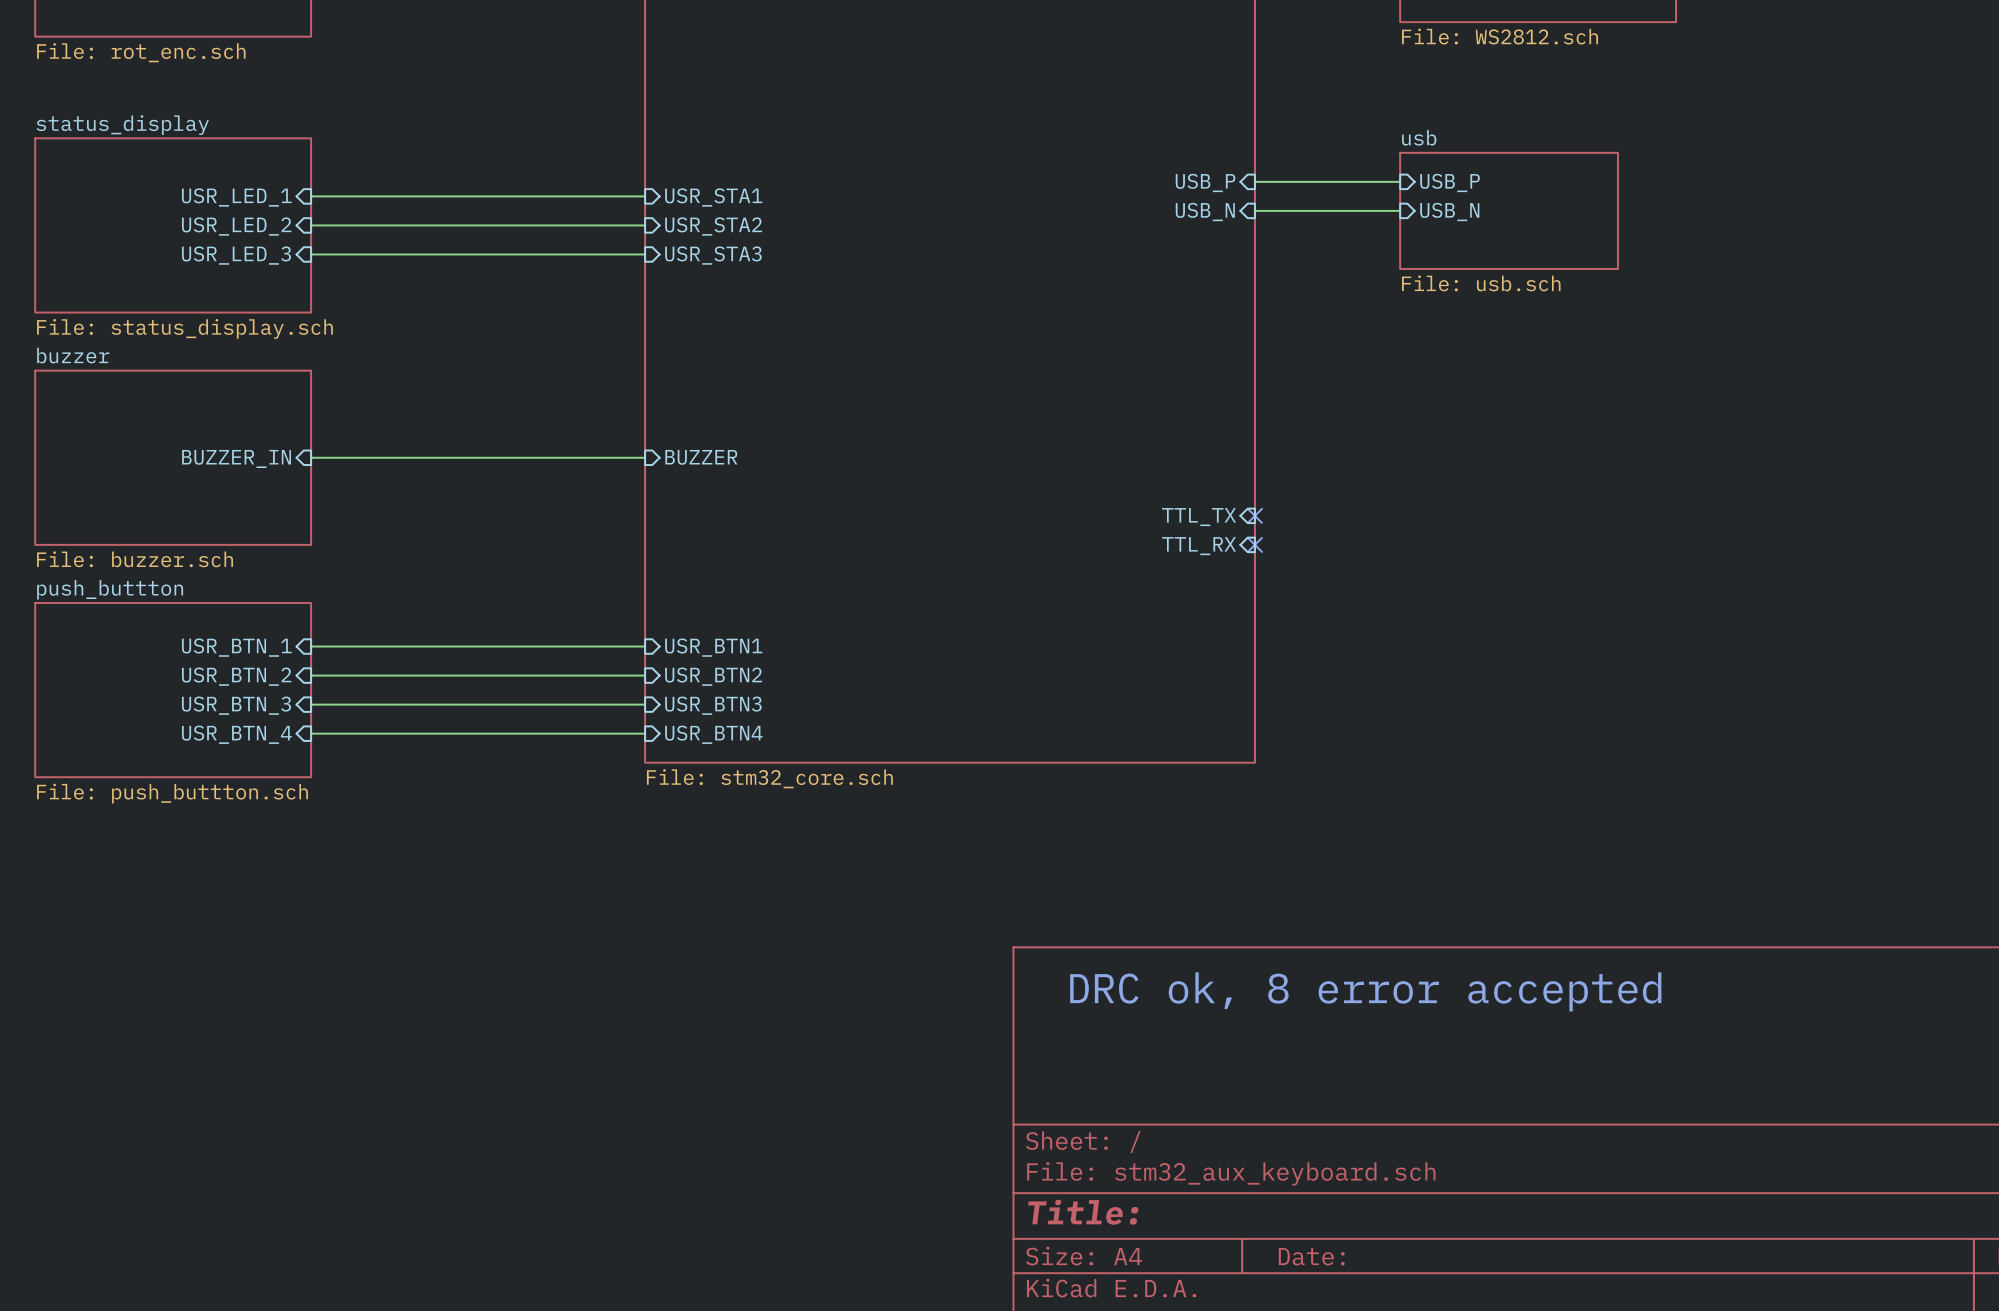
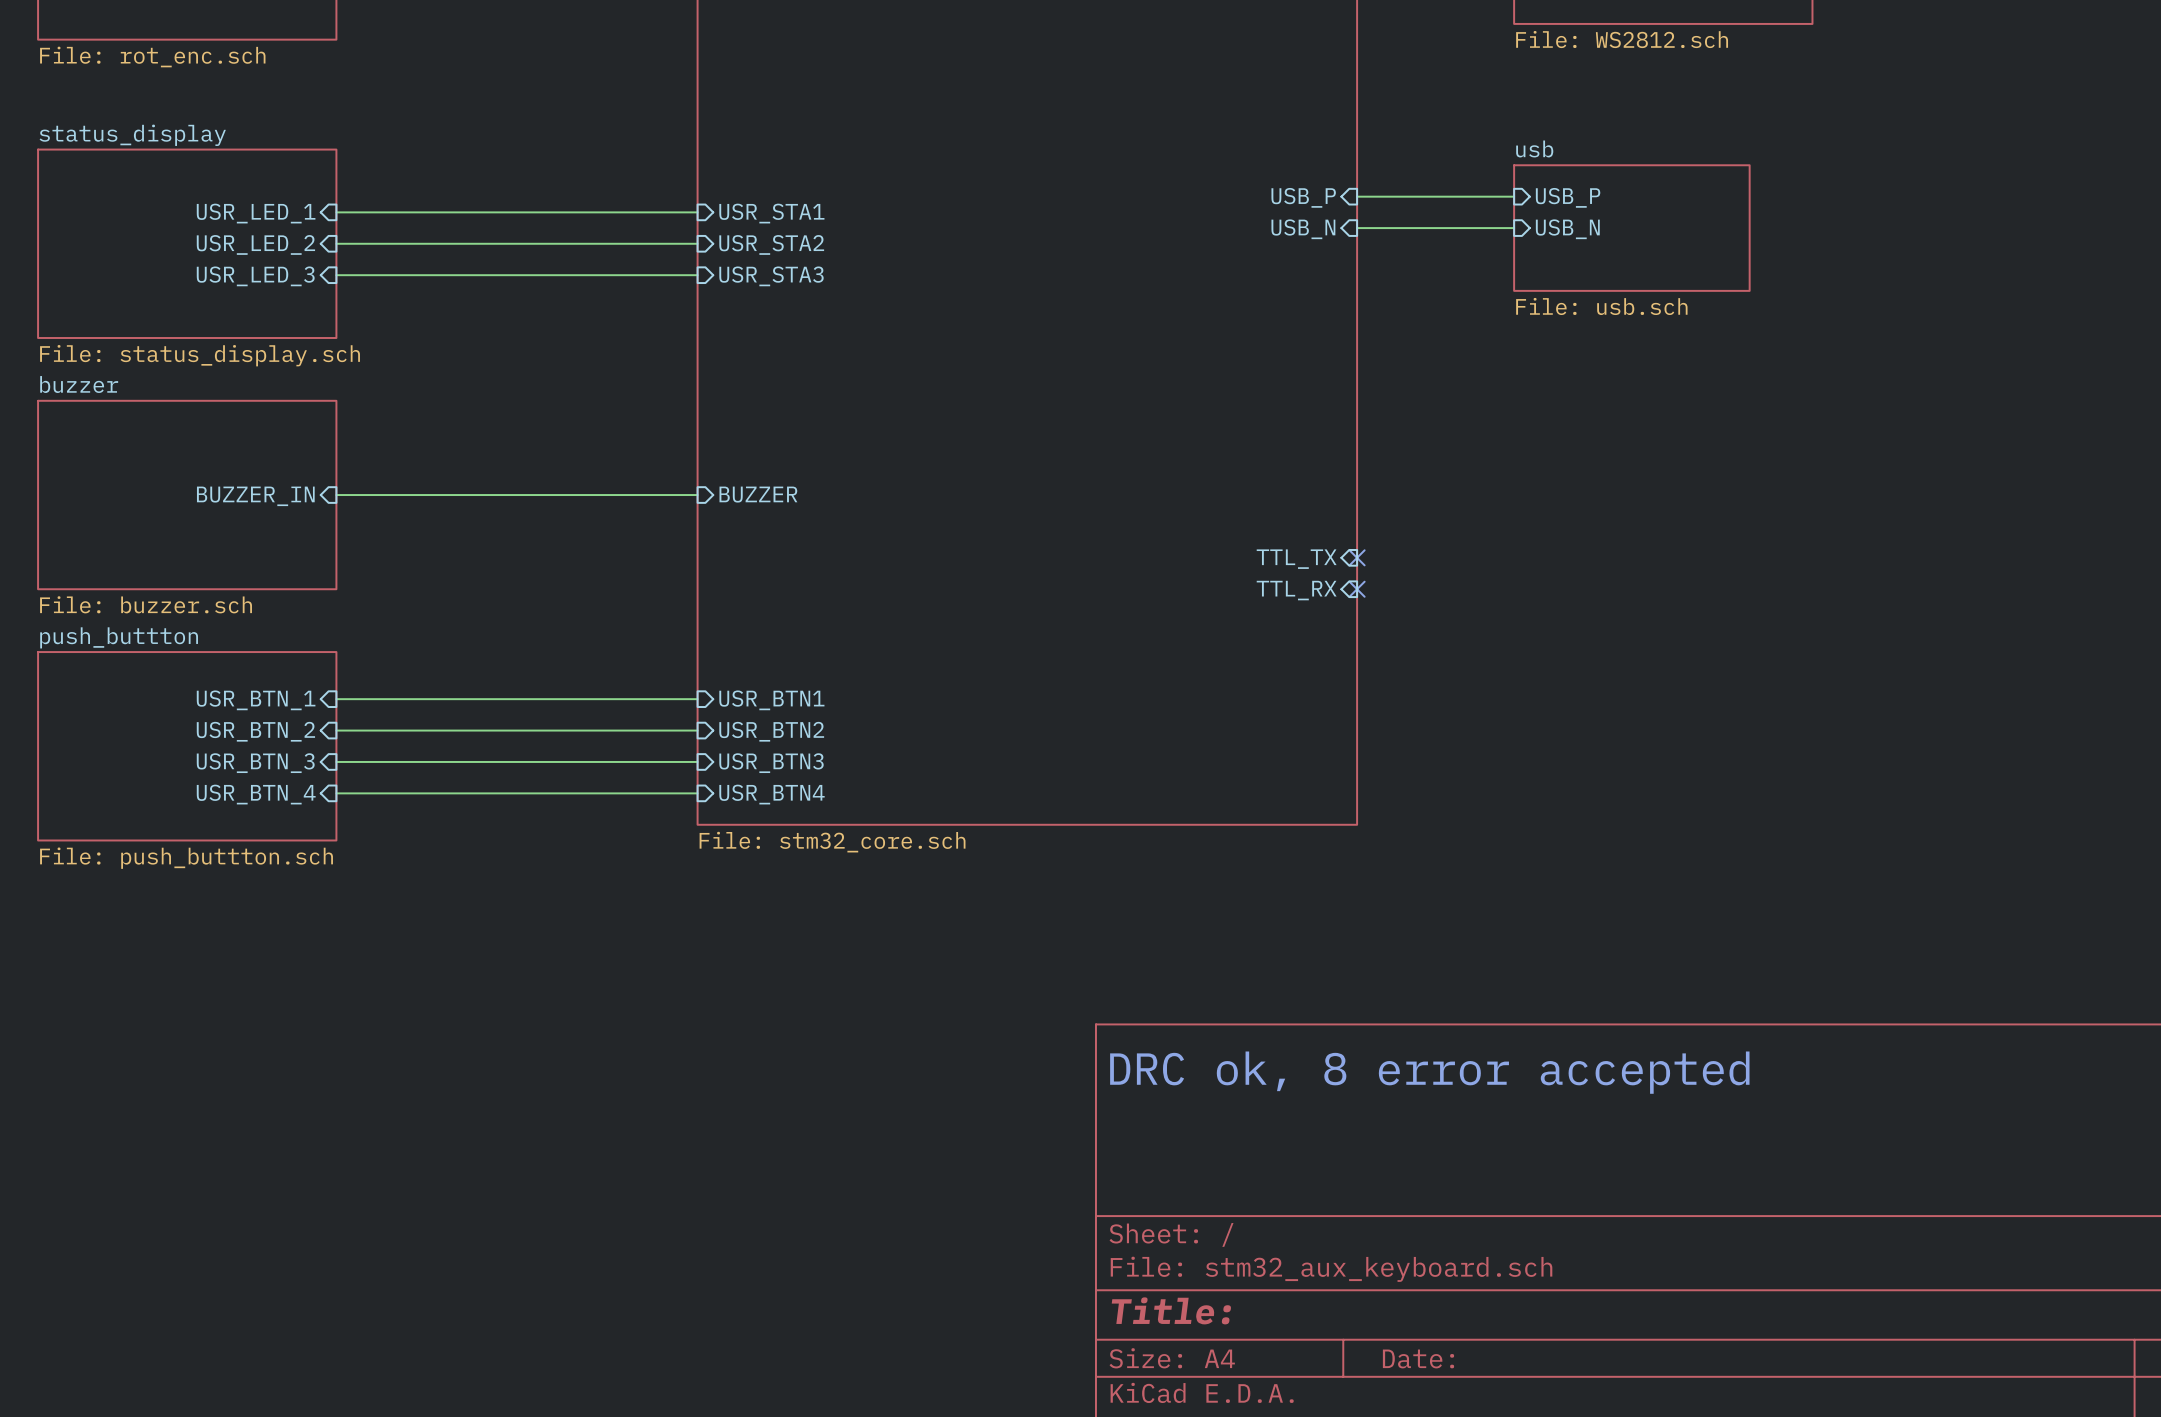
text position: DRC ok, 8 error accepted (1365, 991) -> DRC ok, 8 error accepted (1429, 1072)

